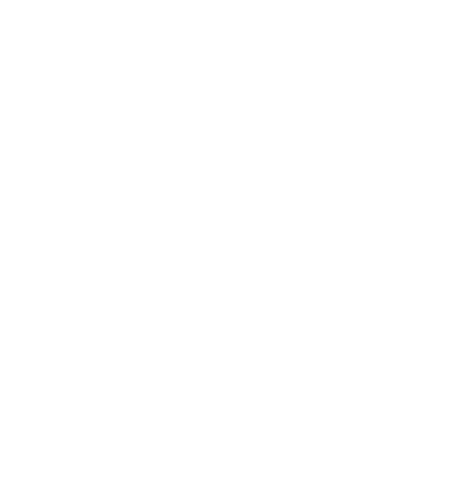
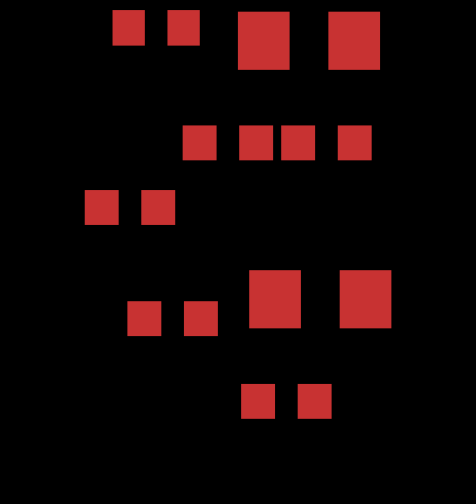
part: none -> (156, 27)
part: none -> (308, 40)
part: none -> (227, 142)
part: none -> (326, 142)
part: none -> (129, 207)
part: none -> (320, 299)
part: none -> (172, 318)
part: none -> (286, 401)

